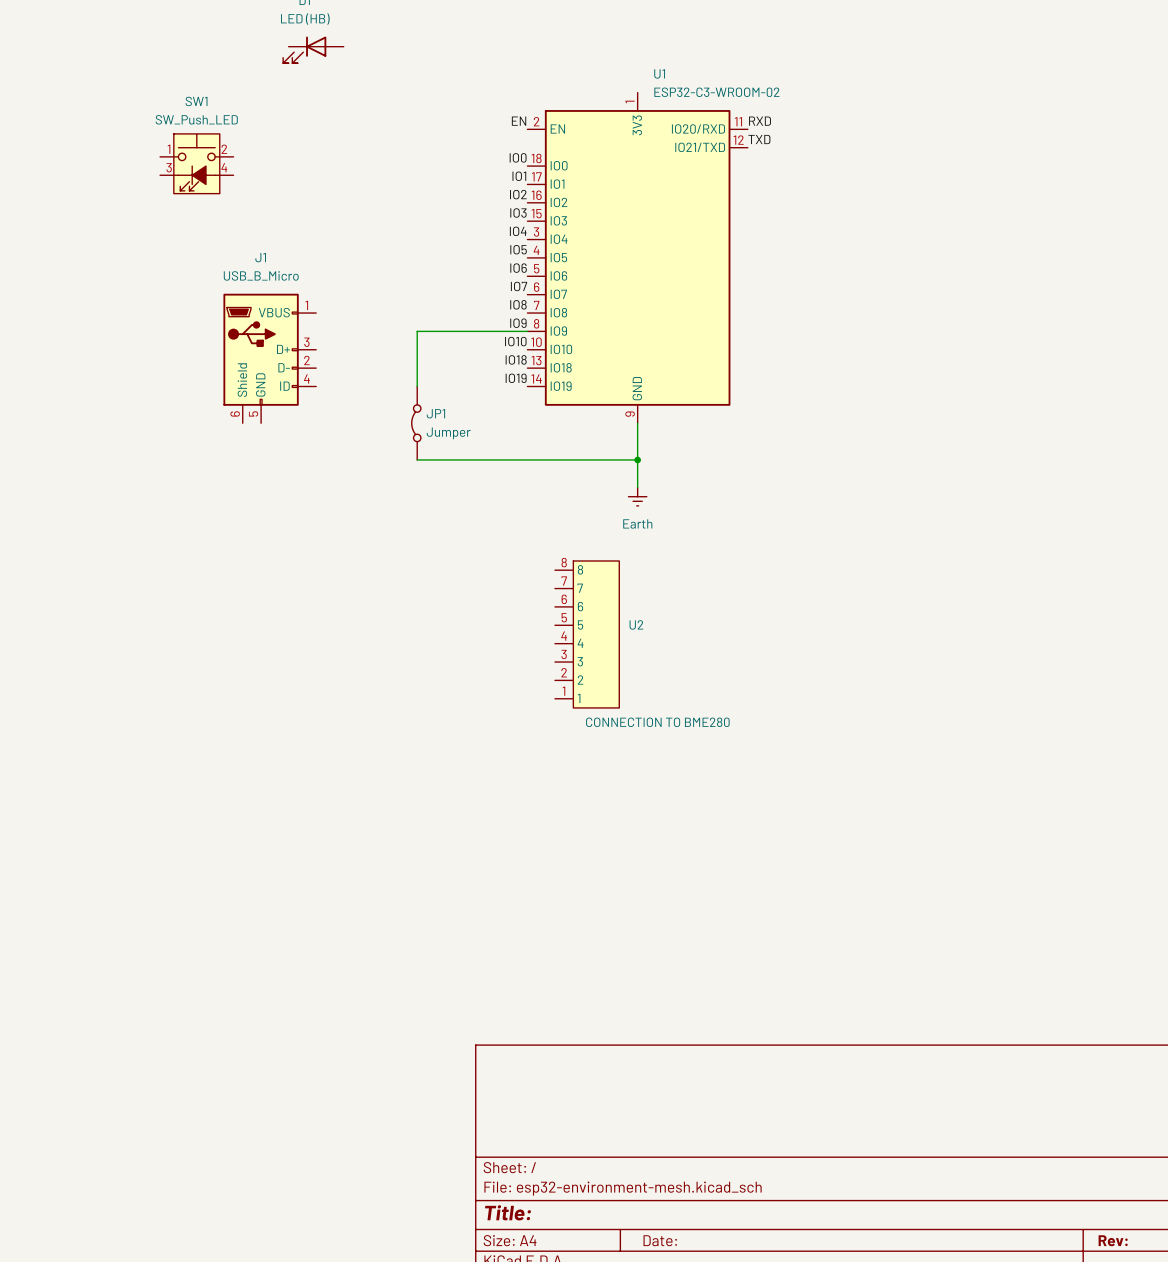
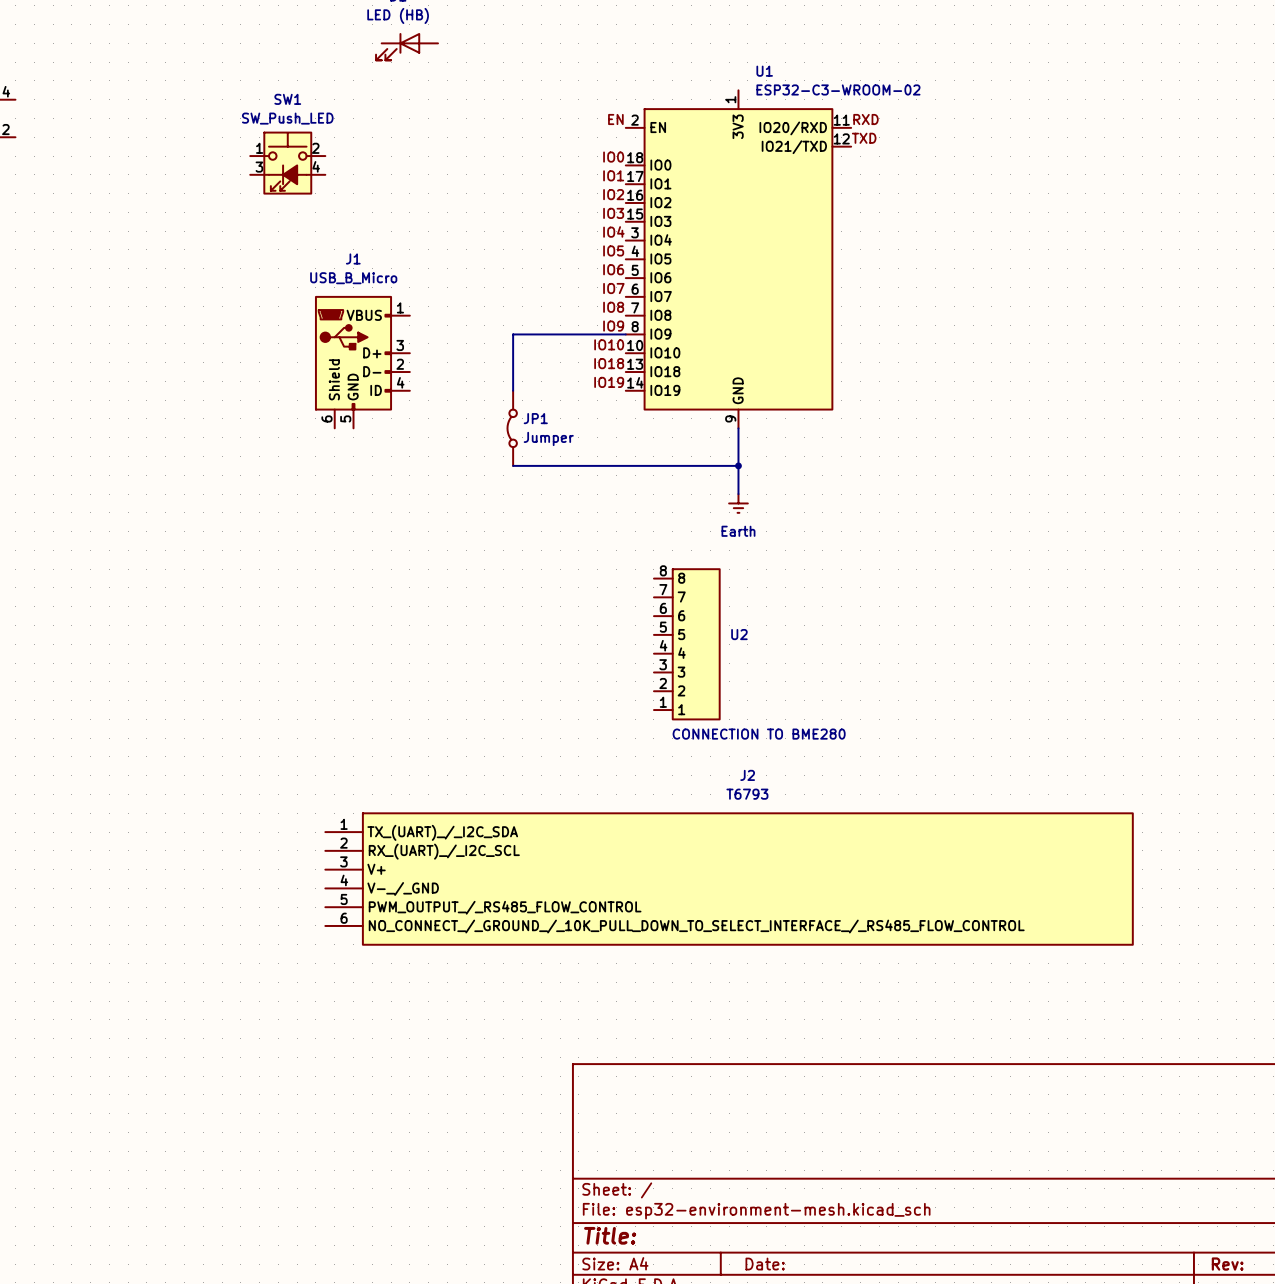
J2: none -> T6793 (729, 879)

